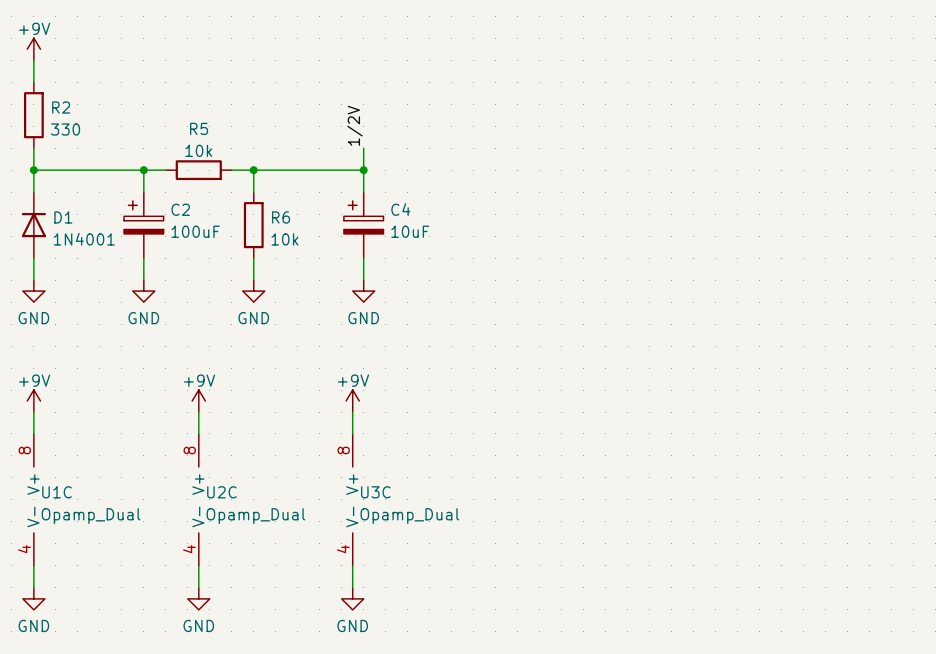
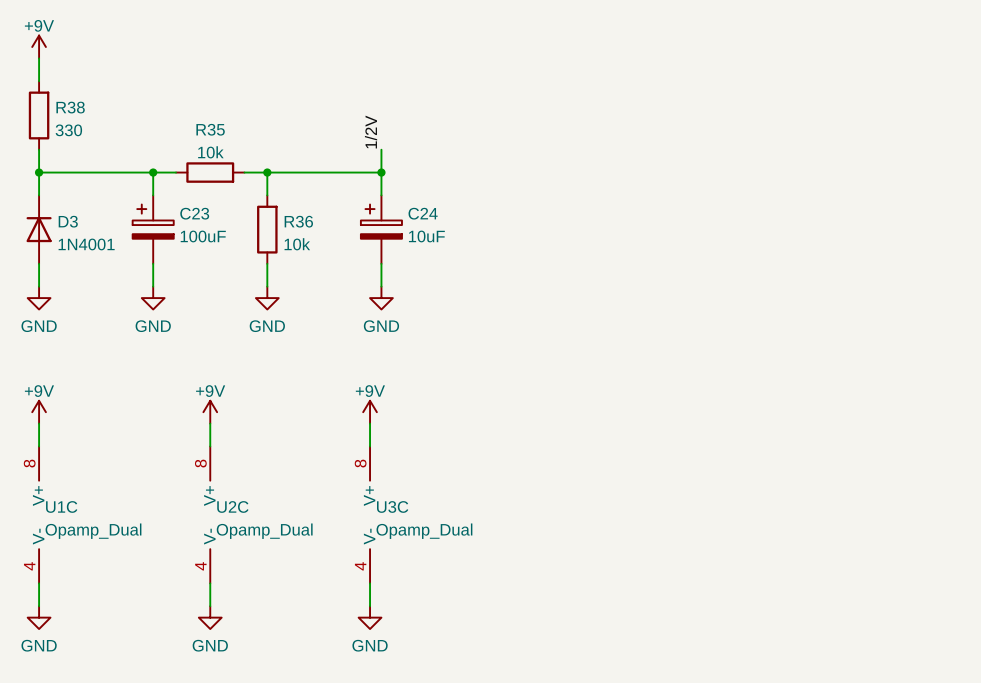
R2 name: R2 (61, 107) -> R38 (70, 107)
R5 name: R5 (199, 128) -> R35 (210, 129)
C2 name: C2 (180, 209) -> C23 (194, 213)
C4 name: C4 (400, 209) -> C24 (423, 213)
D1 name: D1 (63, 217) -> D3 (68, 221)
R6 name: R6 (281, 217) -> R36 (298, 221)

